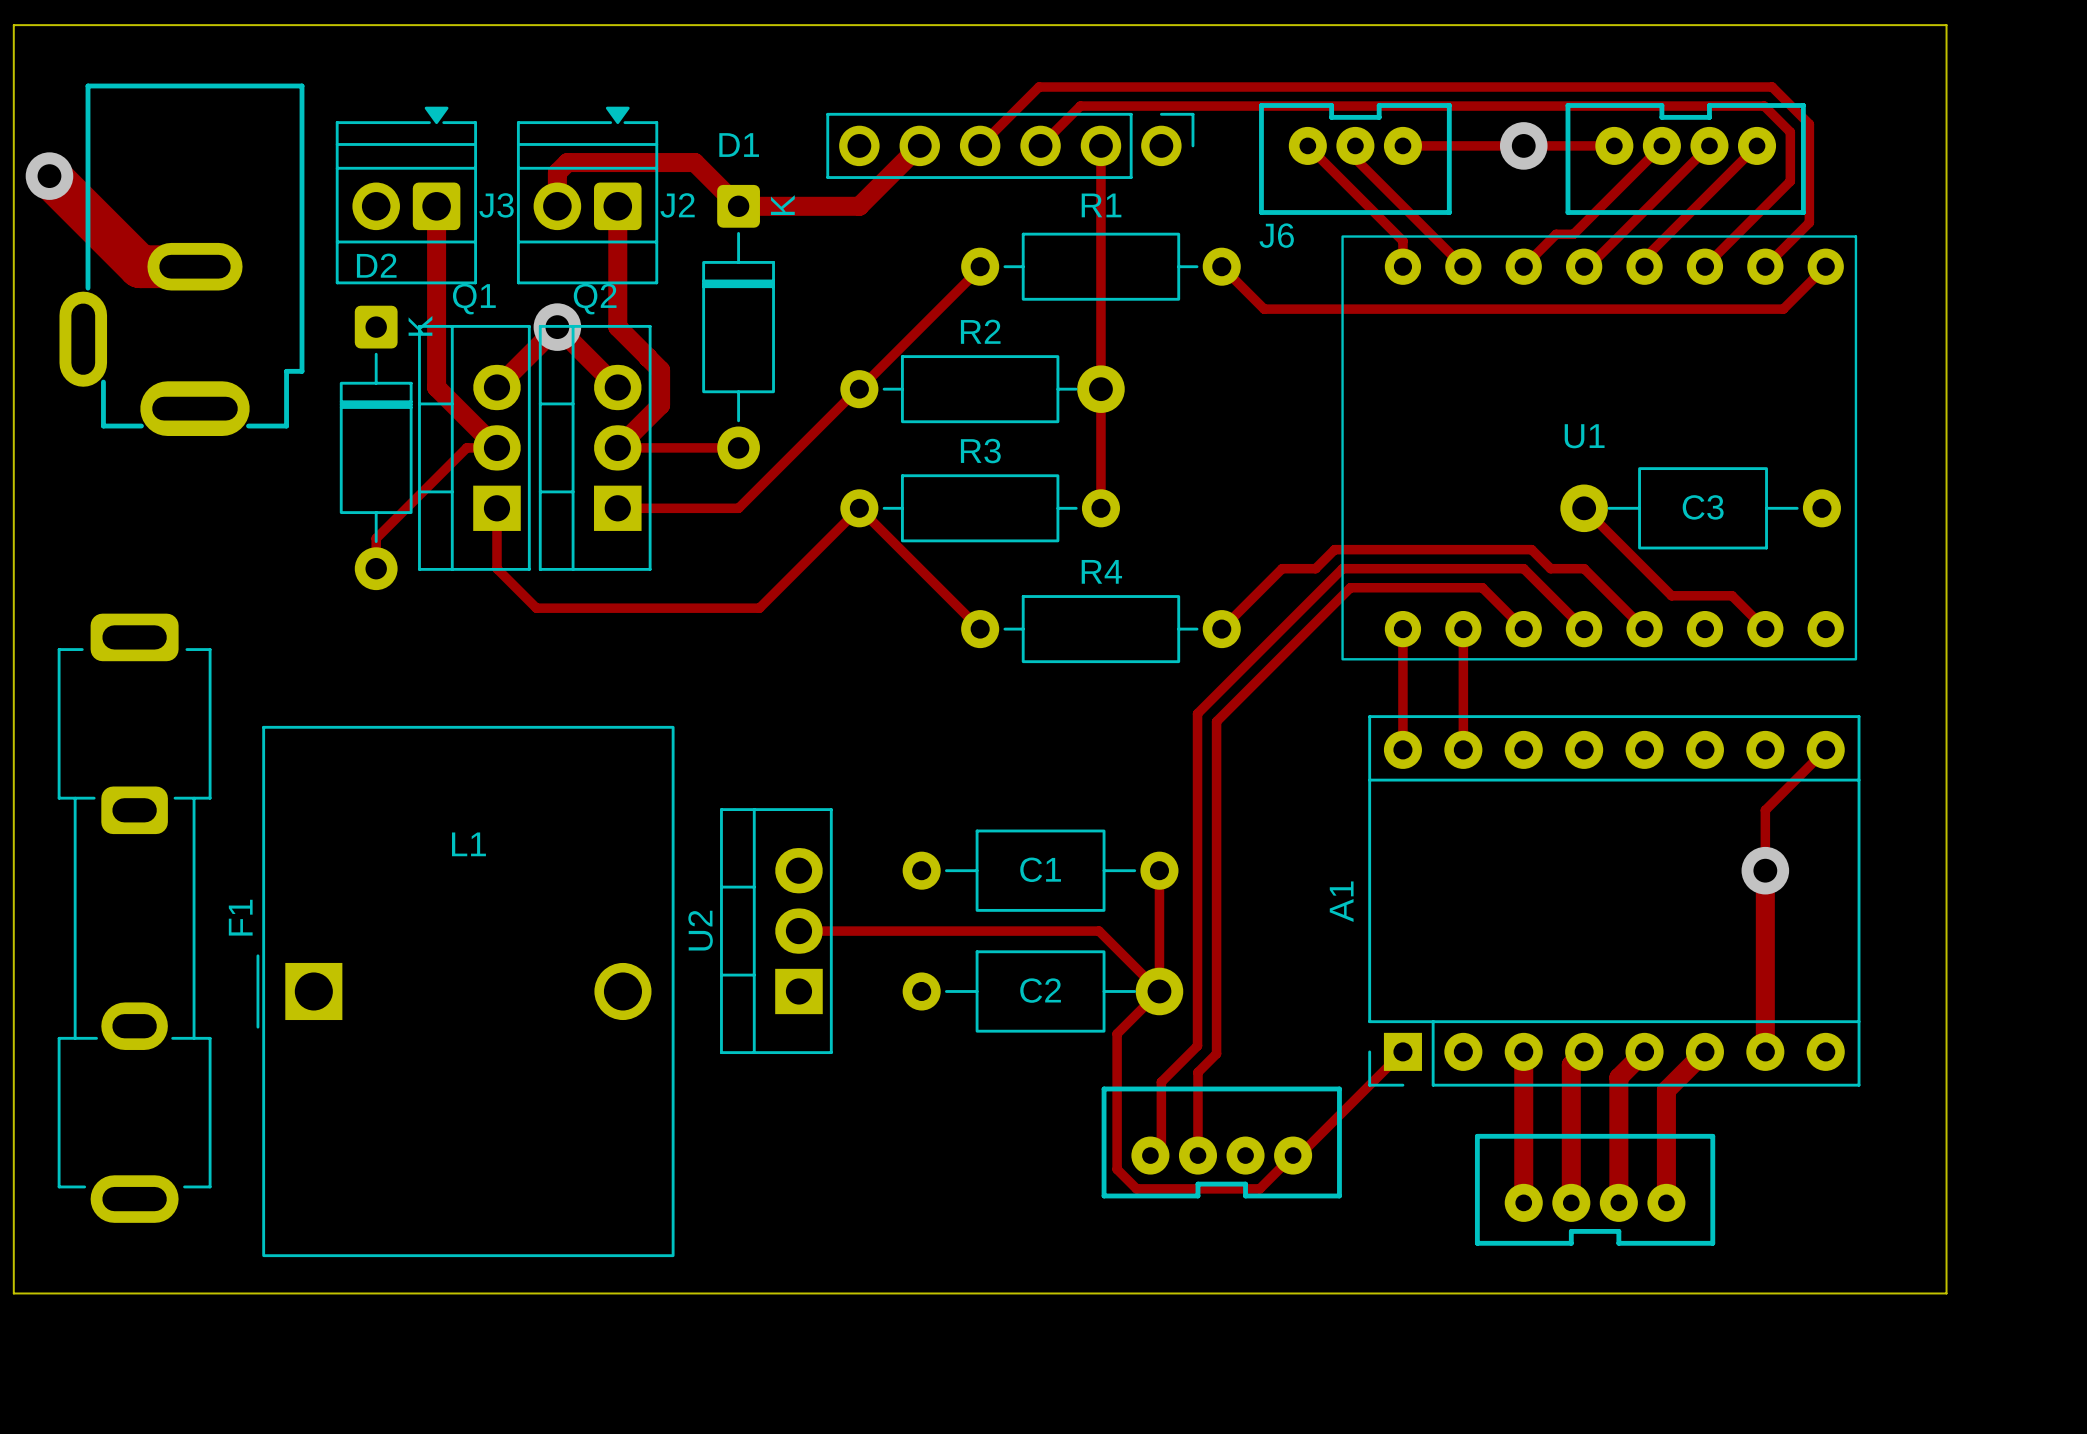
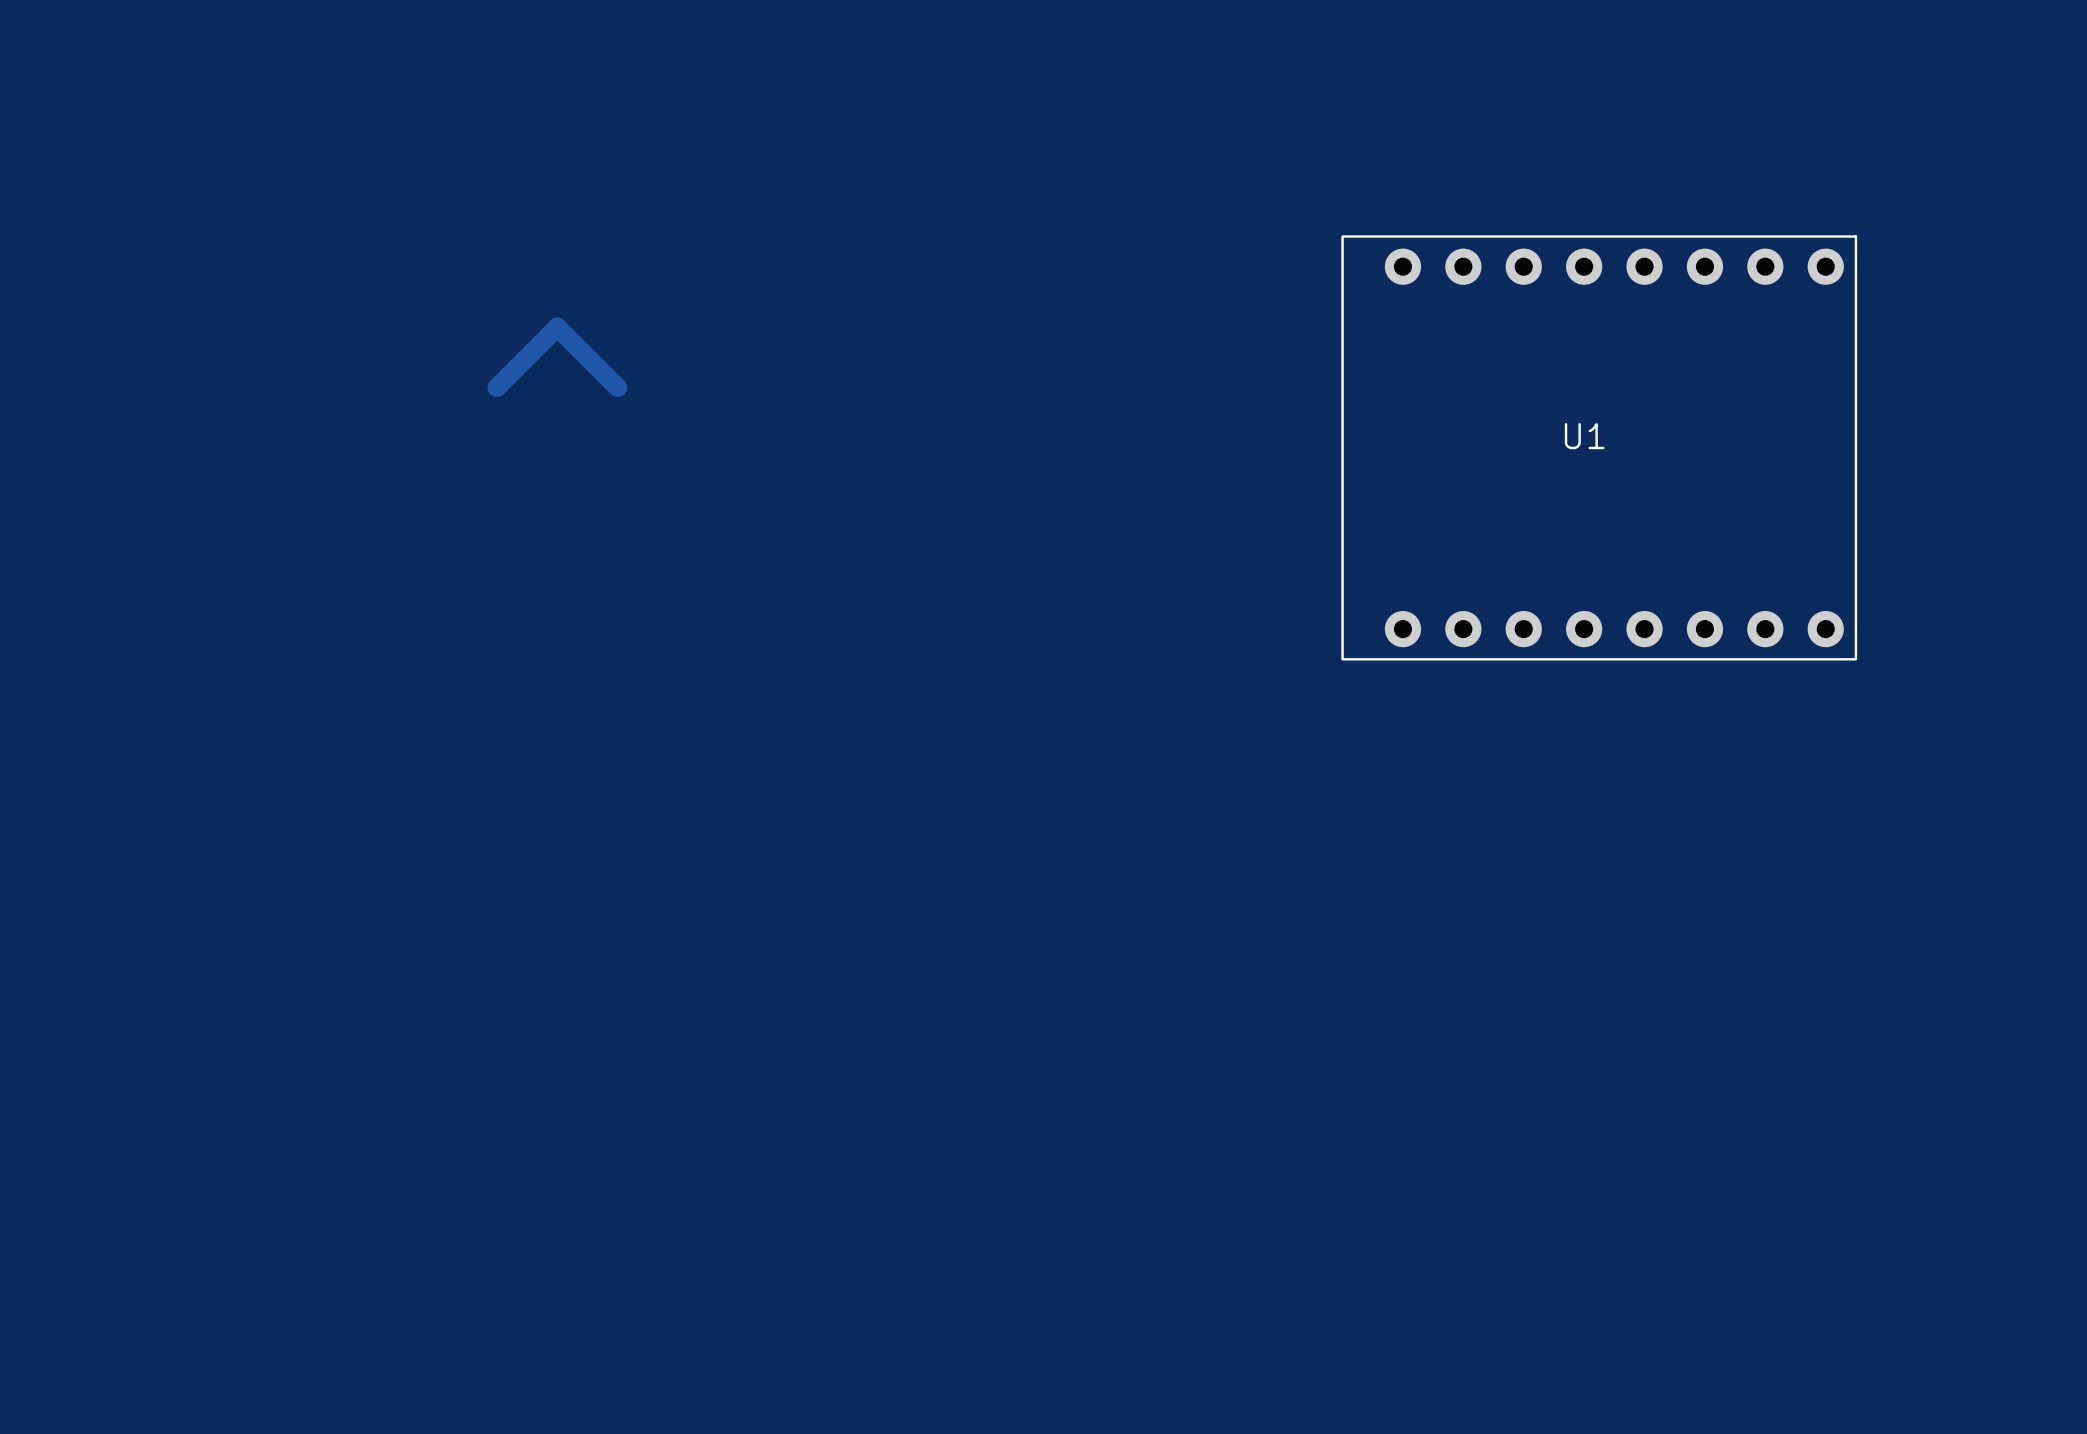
board edge: (13, 25) (1946, 25) (1946, 1293) (13, 1293) (13, 25) -> none
track: (919, 145) (859, 206) (738, 206) (694, 162) (567, 162) (557, 172) (557, 206) -> none
track: (980, 145) (1039, 87) (1772, 87) (1809, 124) (1809, 222) (1765, 266) -> none
J6: (1010, 145) -> none
track: (1040, 145) (1080, 106) (1764, 106) (1790, 132) (1790, 181) (1704, 266) -> none
track: (1100, 145) (1100, 508) -> none
track: (1307, 145) (1402, 241) (1402, 266) -> none
track: (1355, 145) (1355, 158) (1463, 266) -> none
track: (1402, 145) (1614, 145) -> none
via: (1523, 145) -> none
track: (1661, 145) (1573, 234) (1556, 234) (1523, 266) -> none
track: (1704, 145) (1709, 145) (1588, 266) (1584, 266) -> none
track: (1757, 145) (1644, 258) (1644, 266) -> none
part: (1355, 158) -> none
part: (1685, 158) -> none
track: (49, 176) (140, 266) (195, 266) -> none
via: (49, 176) -> none
J3: (406, 195) -> none
J2: (587, 195) -> none
track: (436, 206) (436, 387) (496, 447) (466, 447) (376, 538) (376, 568) -> none
track: (617, 206) (617, 327) (647, 357) -> none
part: (181, 259) -> none
track: (980, 266) (981, 266) (738, 508) (617, 508) -> none
R1: (1100, 266) -> none
track: (1221, 266) (1264, 309) (1783, 309) (1825, 266) -> none
via: (557, 327) -> none
D1: (738, 327) -> none
track: (647, 357) (660, 370) (660, 405) (617, 447) (738, 447) -> none
R2: (982, 389) -> none
D2: (376, 447) -> none
Q1: (474, 447) -> none
Q2: (595, 447) -> none
track: (496, 508) (496, 568) (536, 608) (759, 608) (859, 508) (980, 629) -> none
R3: (980, 508) -> none
track: (1584, 508) (1671, 595) (1732, 595) (1765, 629) -> none
C3: (1700, 508) -> none
R4: (1100, 629) -> none
track: (1221, 629) (1282, 568) (1315, 568) (1334, 549) (1531, 549) (1550, 568) (1584, 568) (1644, 629) -> none
track: (1402, 629) (1402, 749) -> none
track: (1463, 629) (1463, 749) -> none
track: (1523, 629) (1482, 587) (1350, 587) (1216, 721) (1216, 1053) (1197, 1072) (1197, 1155) -> none
track: (1584, 629) (1523, 568) (1342, 568) (1197, 713) (1197, 1045) (1161, 1082) (1161, 1144) (1150, 1155) -> none
track: (1825, 749) (1765, 810) (1765, 1051) -> none
C1: (1040, 870) -> none
track: (1159, 870) (1159, 991) -> none
via: (1765, 870) -> none
A1: (1614, 900) -> none
F1: (134, 918) -> none
U2: (776, 931) -> none
track: (798, 931) (1099, 931) (1159, 991) -> none
L1: (465, 991) -> none
C2: (1042, 991) -> none
track: (1159, 991) (1117, 1033) (1117, 1169) (1136, 1188) (1259, 1188) (1293, 1155) (1299, 1155) (1402, 1051) -> none
track: (1523, 1051) (1523, 1202) -> none
track: (1584, 1051) (1571, 1064) (1571, 1202) -> none
track: (1644, 1051) (1618, 1077) (1618, 1202) -> none
track: (1704, 1051) (1666, 1090) (1666, 1202) -> none
part: (1221, 1142) -> none
part: (1595, 1189) -> none

